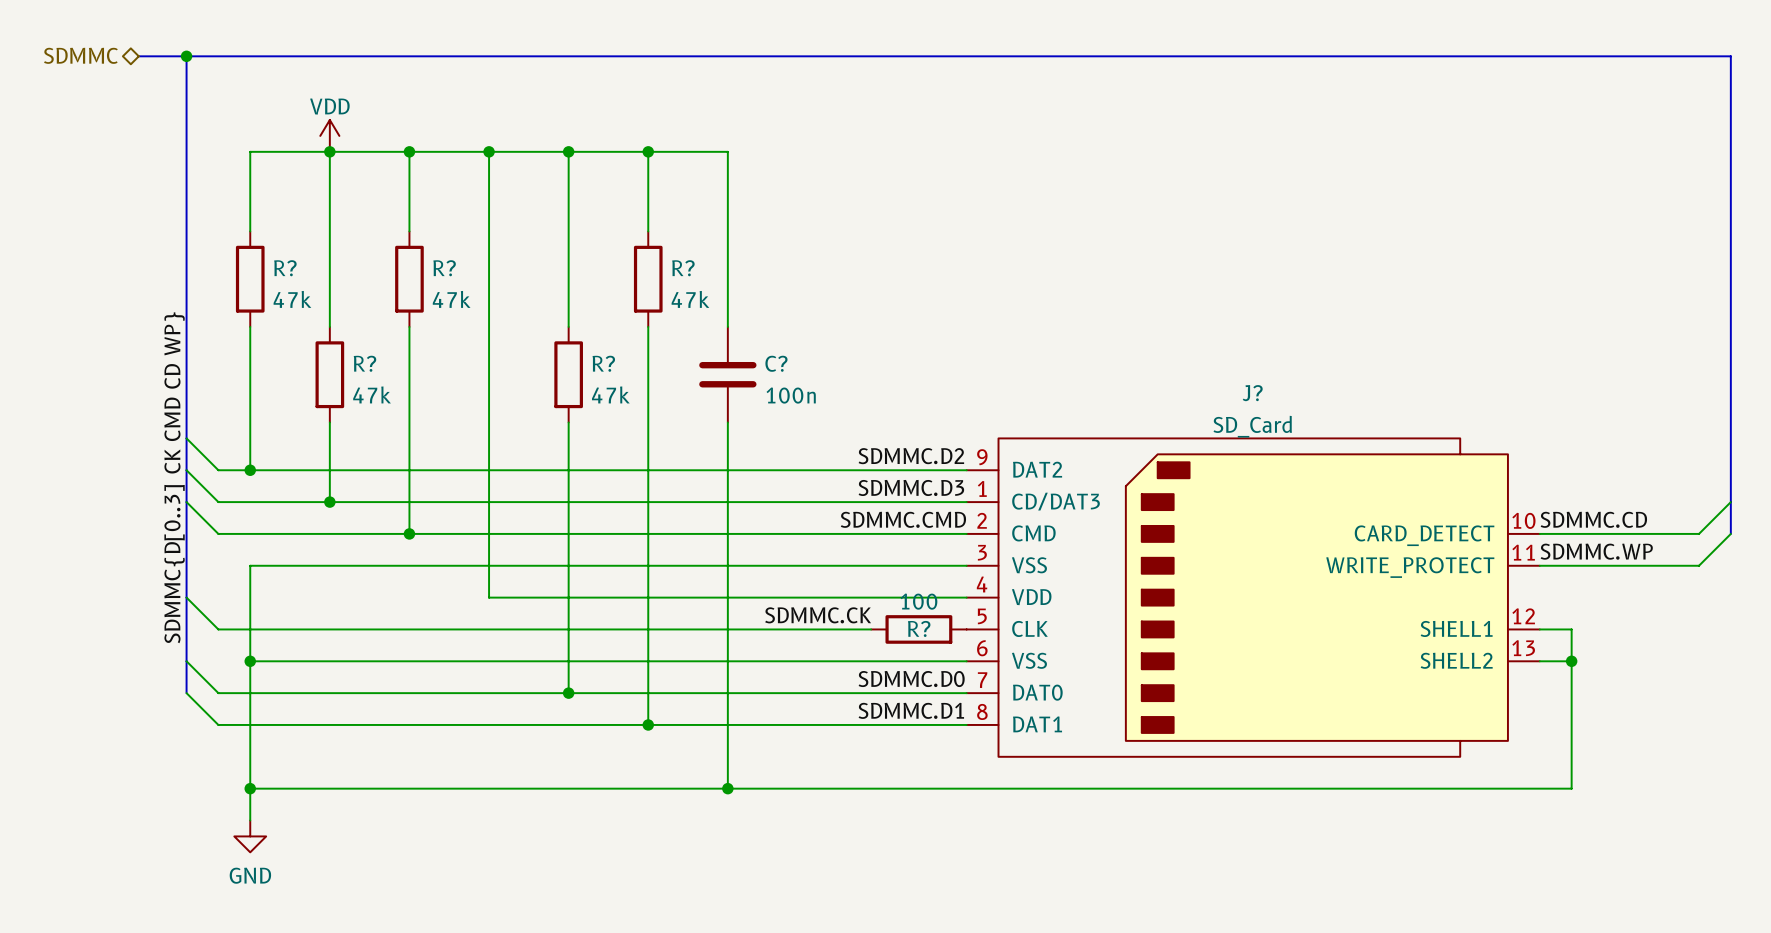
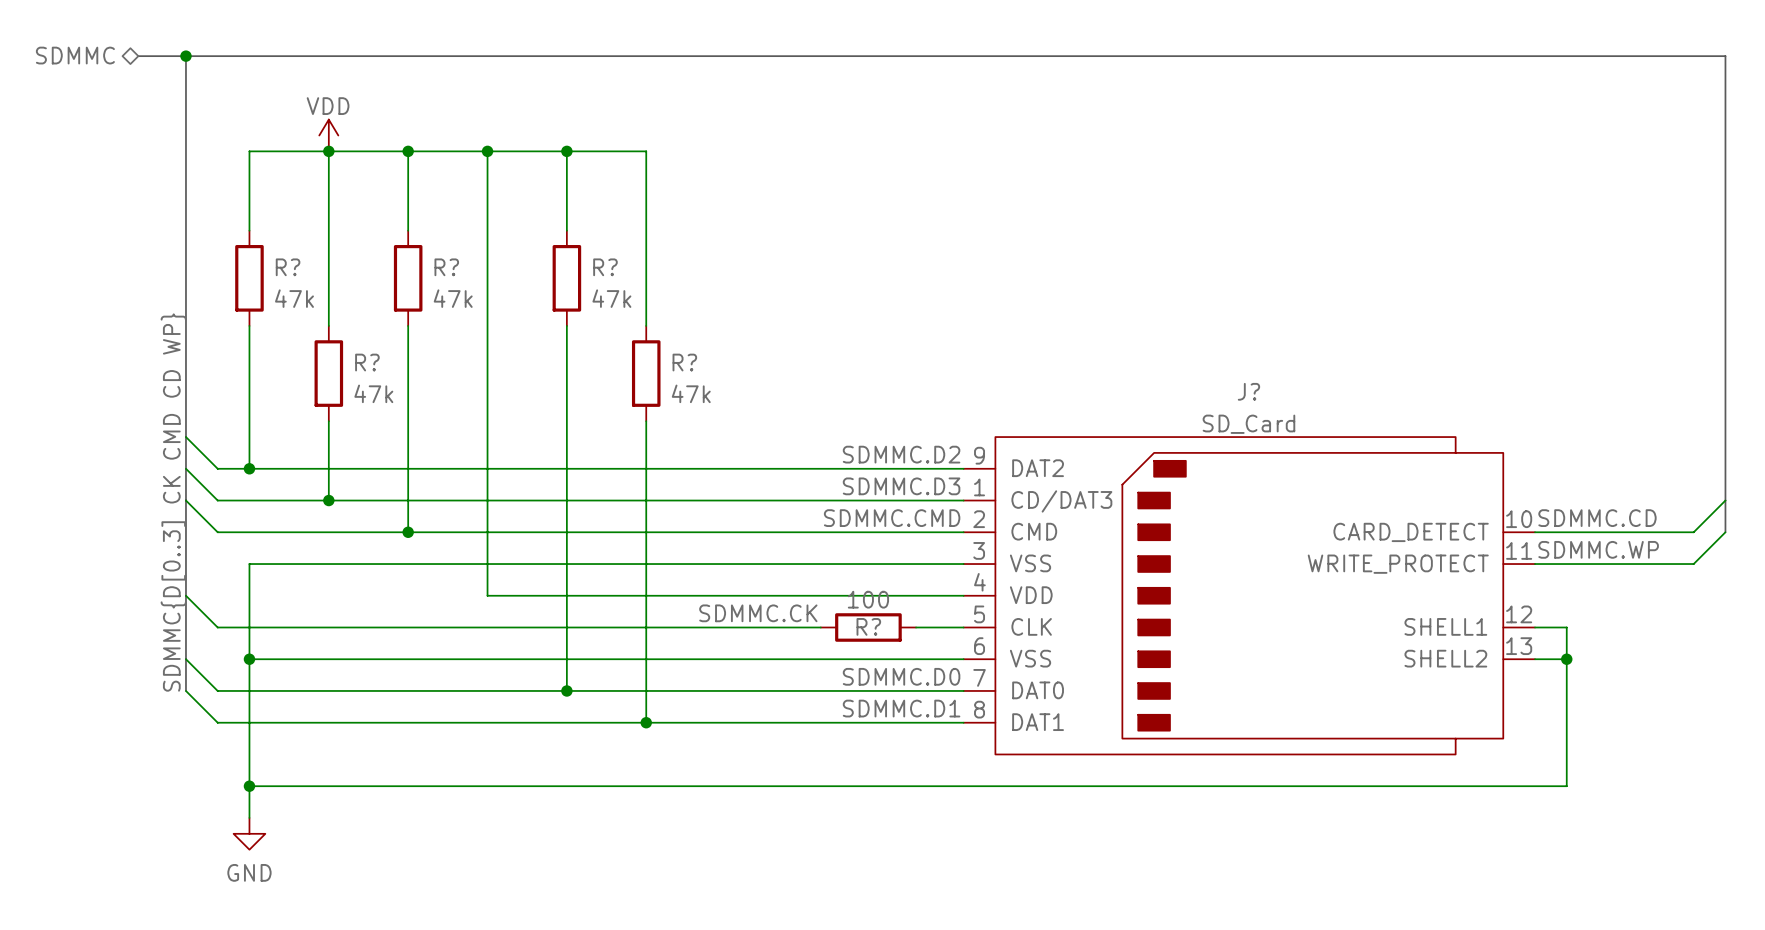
wire: (648, 151) (727, 151) (727, 326) -> none
junction: (648, 151) -> none
wire: (568, 231) (568, 326) -> (566, 421) (566, 325)
R?: none -> 47k (566, 278)
R?: 47k (648, 279) -> none
wire: (648, 326) (648, 422) -> (646, 325) (646, 230)
R?: 47k (568, 374) -> none
R?: none -> 47k (646, 373)
C?: 100n (727, 374) -> none
wire: (727, 422) (727, 788) -> none
label position: SDMMC.CK (818, 615) -> SDMMC.CK (758, 613)
wire: (823, 629) (871, 629) -> (916, 627) (963, 627)
R? position: (918, 629) -> (868, 627)
junction: (727, 788) -> none

